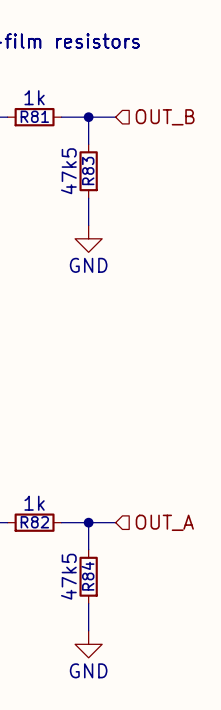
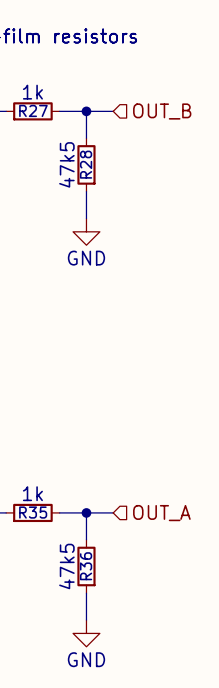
R81 name: R81 (34, 116) -> R27 (33, 110)
R83 name: R83 (88, 170) -> R28 (86, 164)
R82 name: R82 (34, 522) -> R35 (33, 512)
R84 name: R84 (87, 576) -> R36 (86, 566)

